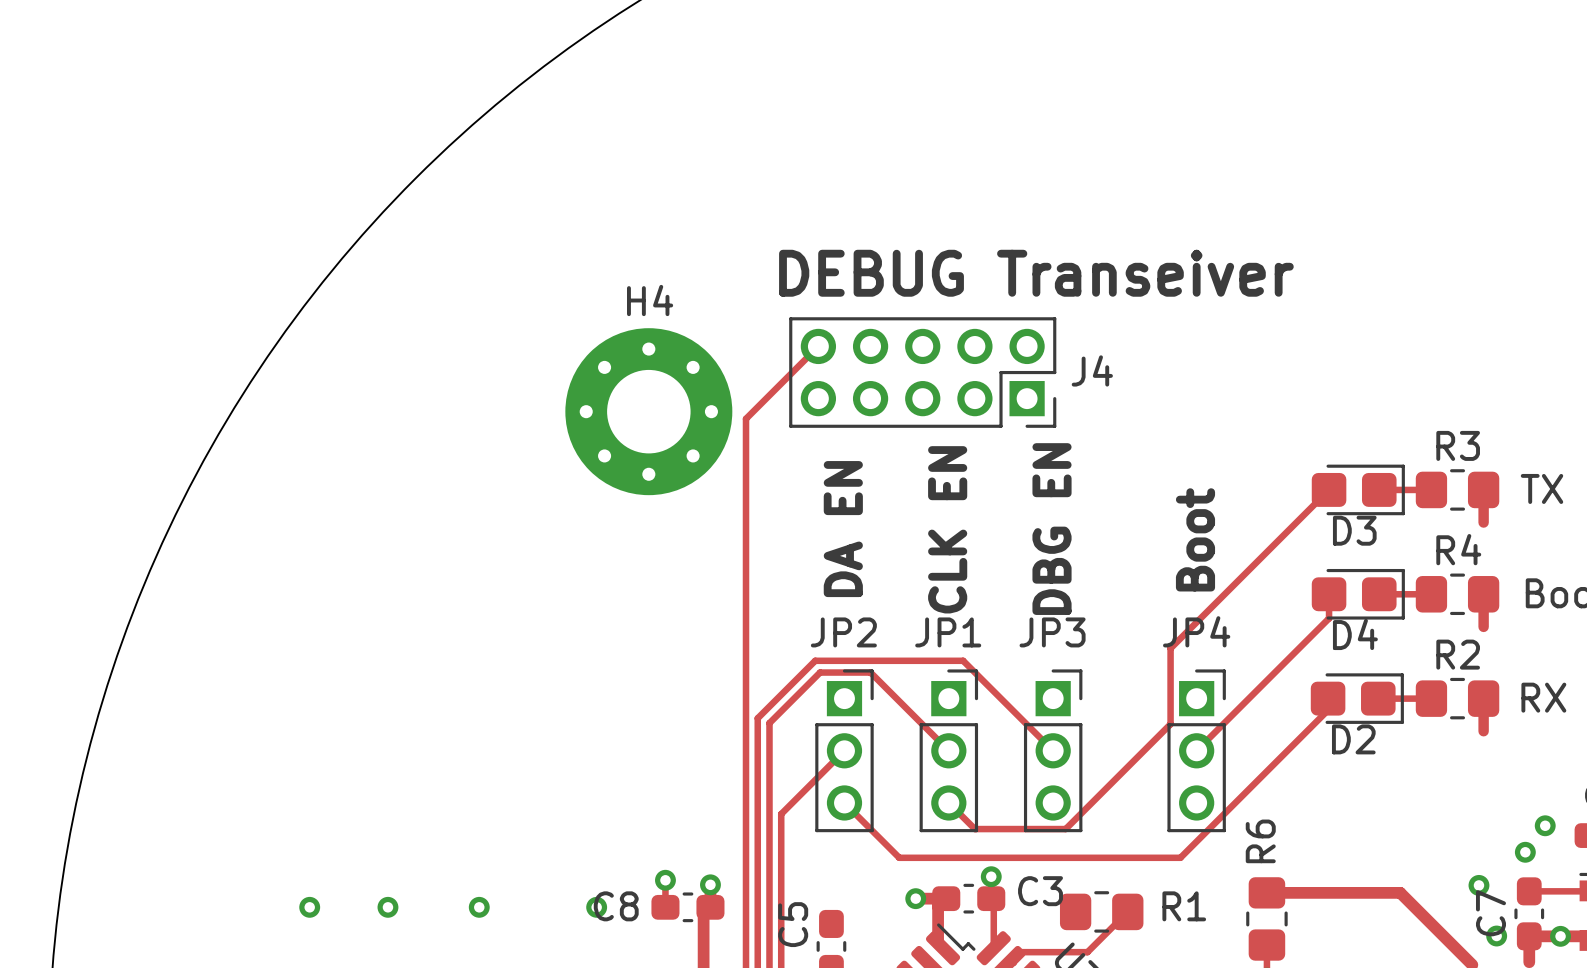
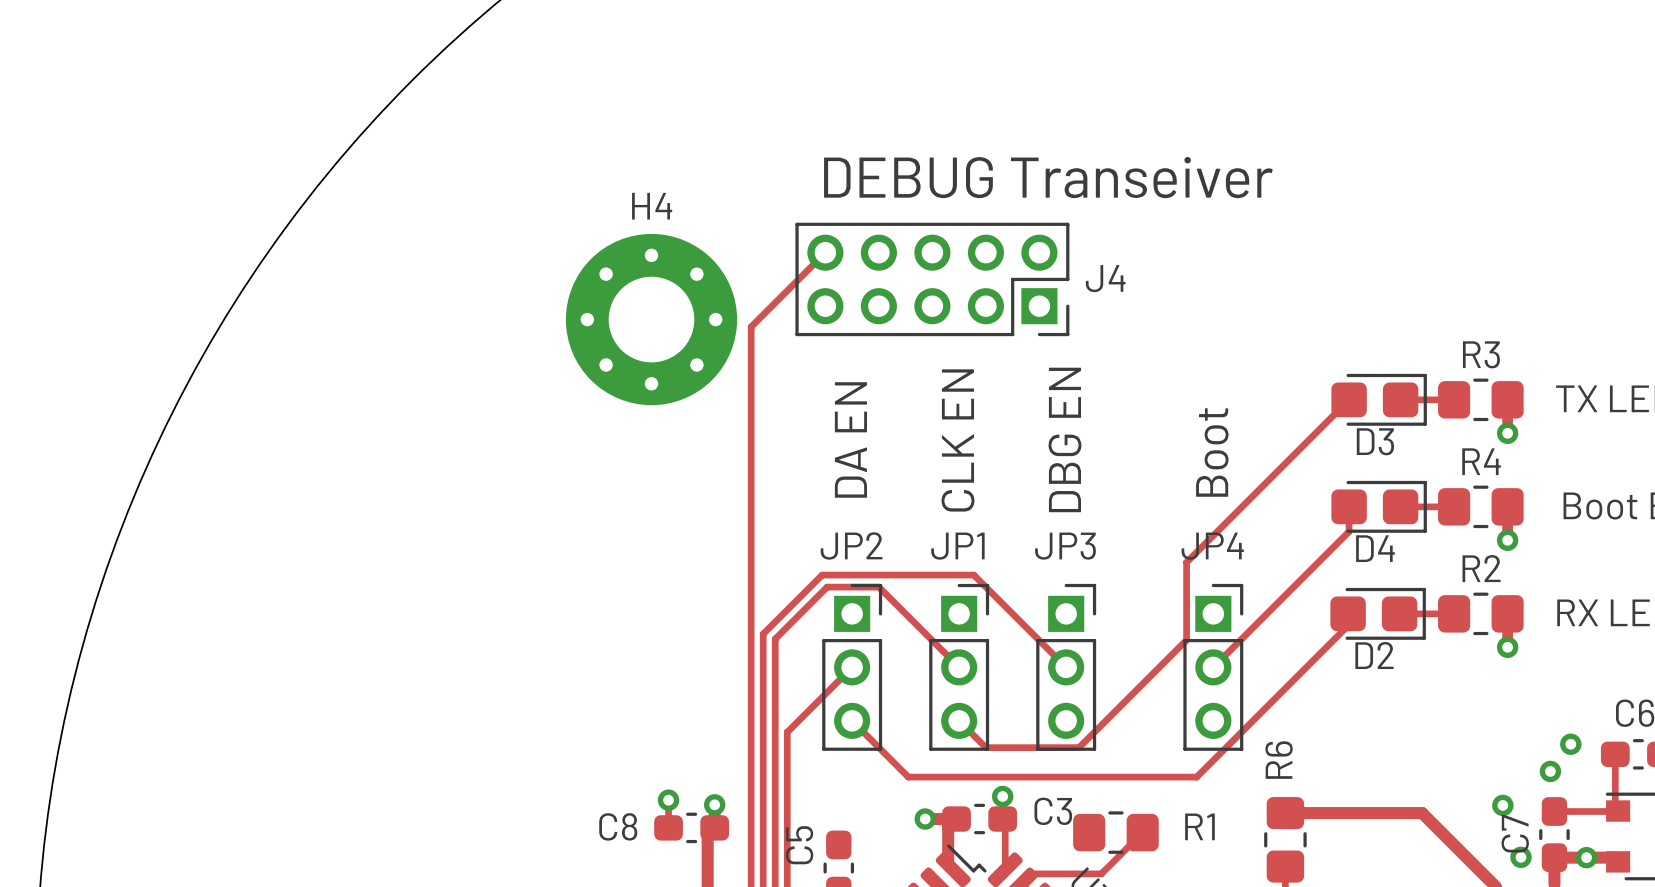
via: none -> (1507, 433)
via: none -> (1507, 540)
via: none -> (1507, 647)
via: (309, 907) -> none
via: (387, 907) -> none
via: (479, 907) -> none
via: (596, 907) -> none

